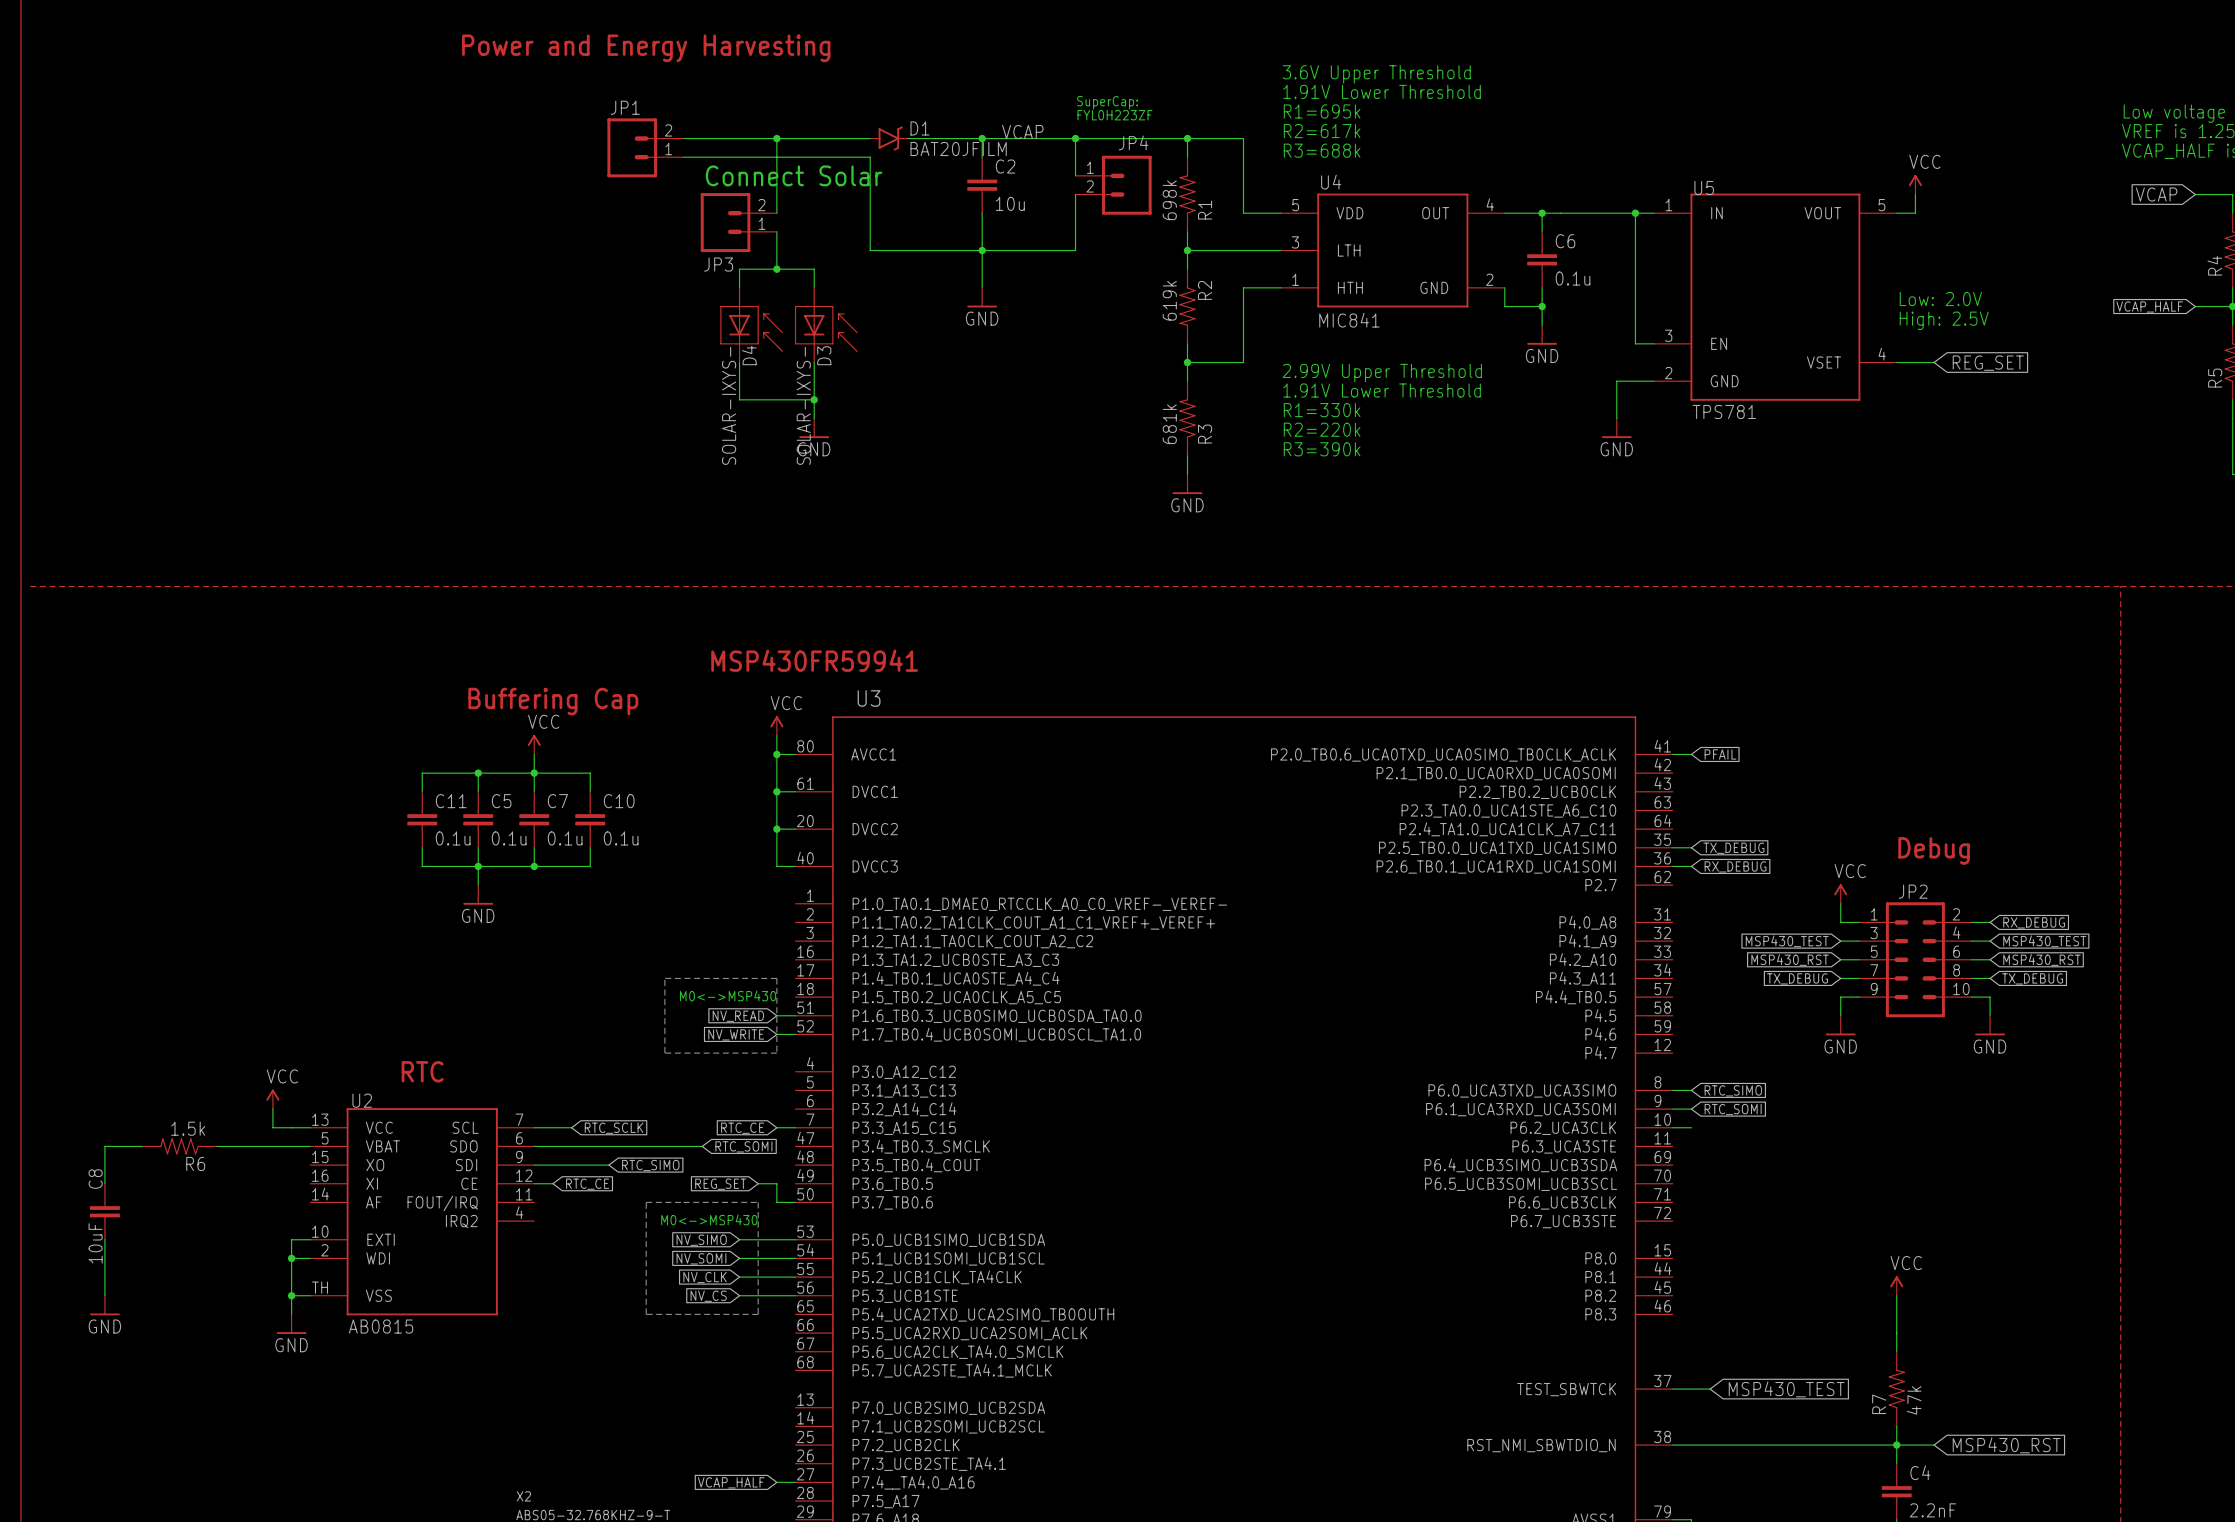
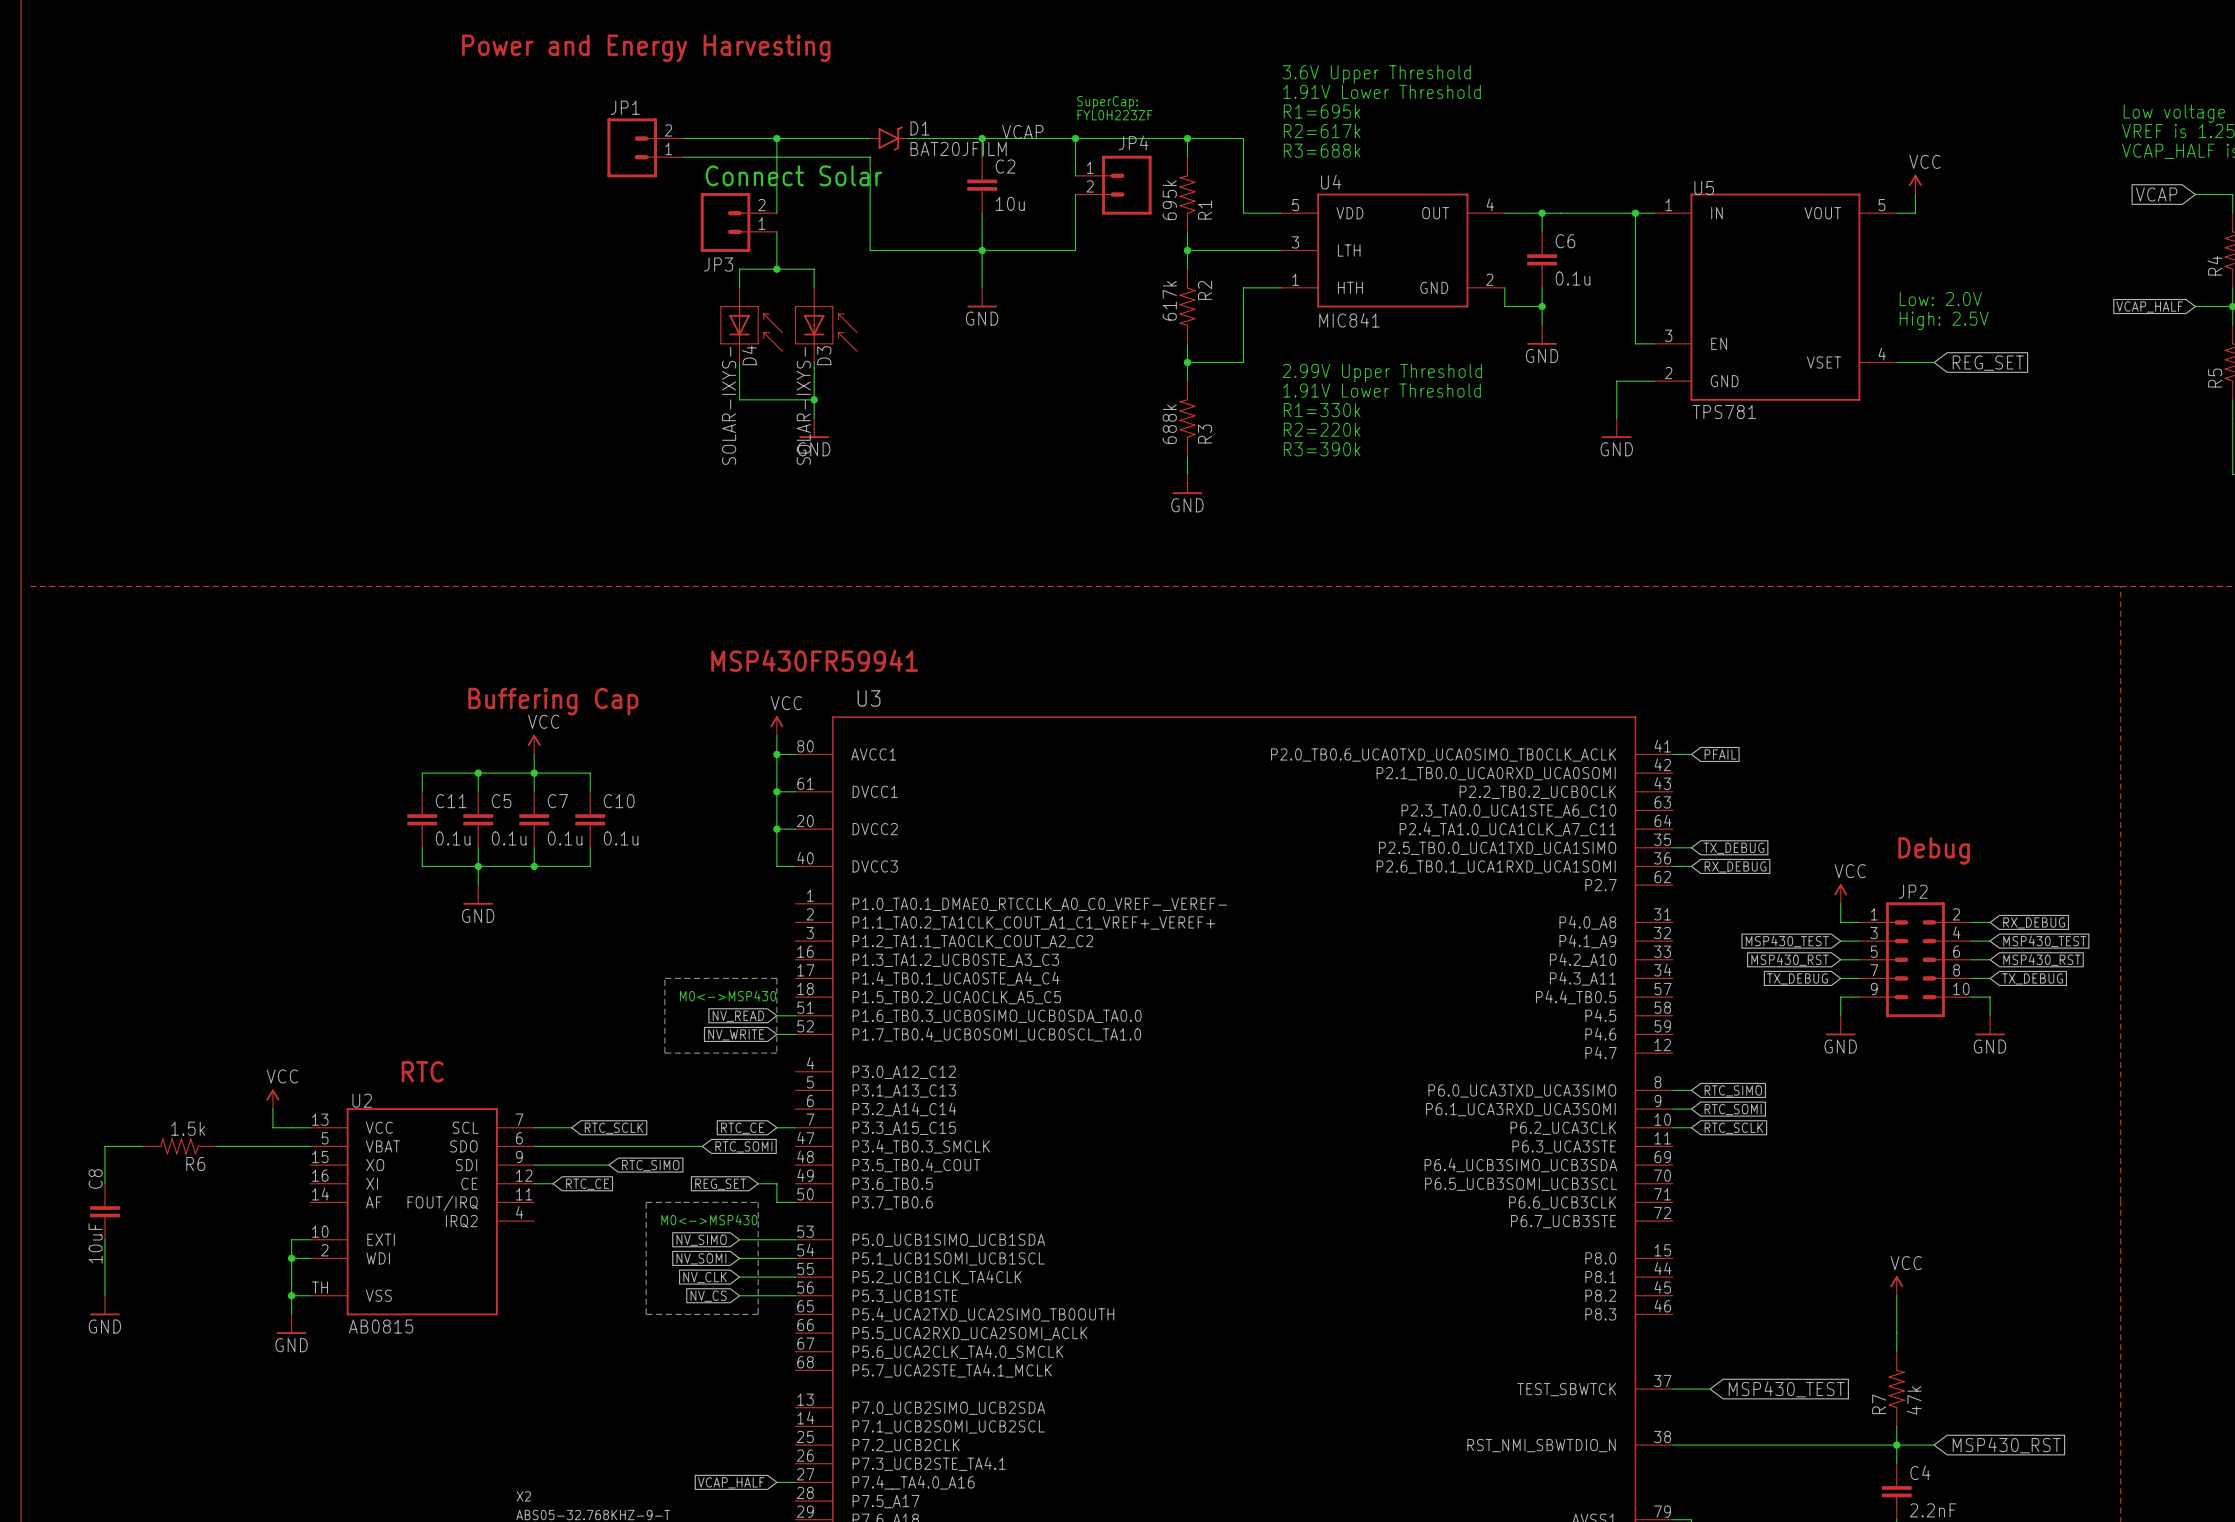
R1 value: 698k (1169, 200) -> 695k (1169, 200)
R2 value: 619k (1169, 300) -> 617k (1169, 300)
R3 value: 681k (1169, 424) -> 688k (1169, 424)
global label: none -> RTC_SCLK (1733, 1128)

